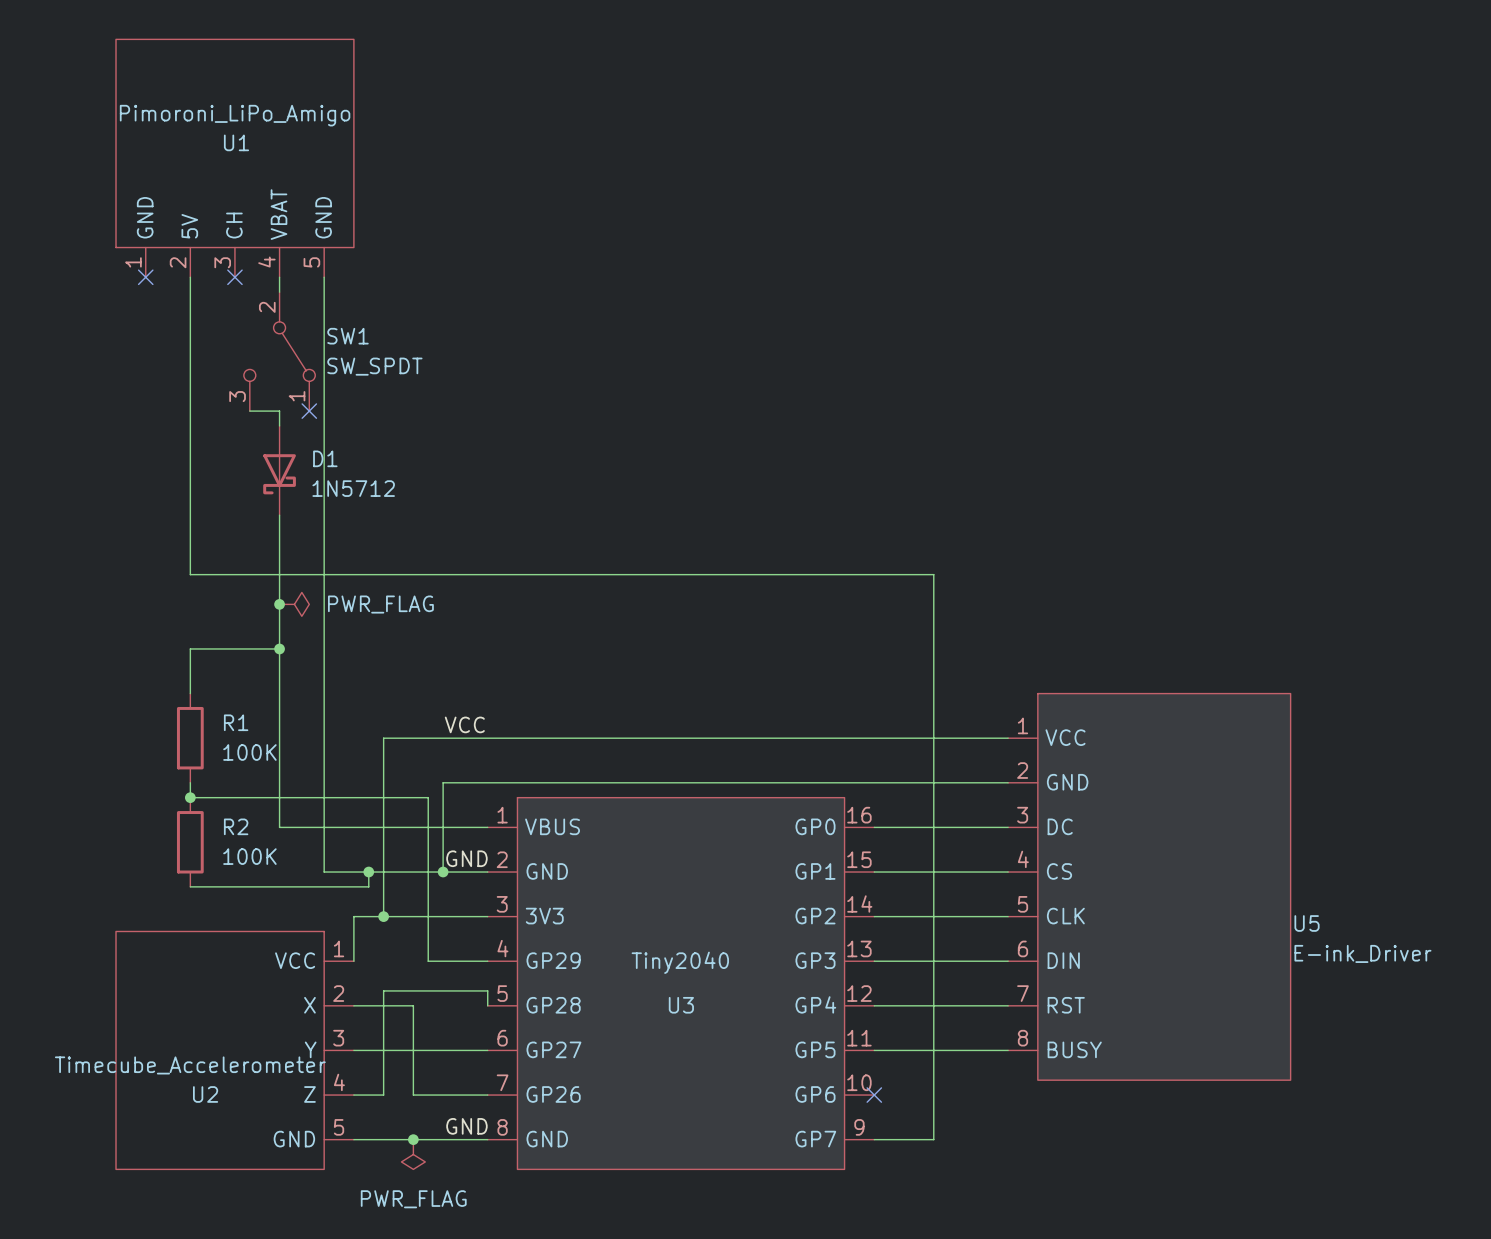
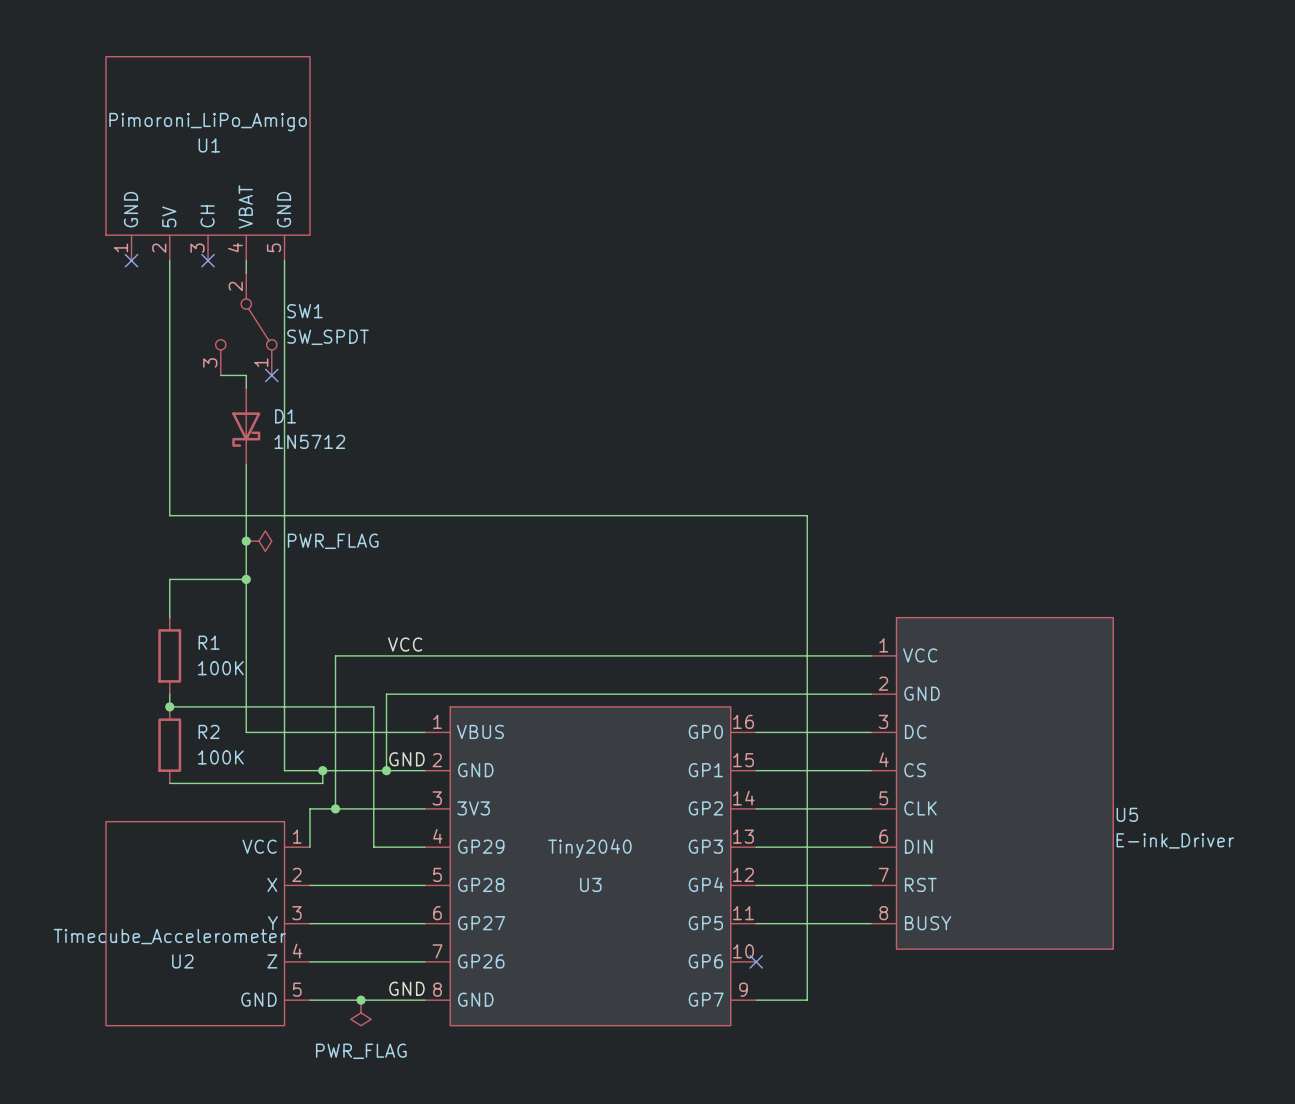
wire: (413, 1005) (413, 1095) -> (335, 961) (361, 961)
wire: (487, 1005) (487, 990) (383, 990) (383, 1095) -> (424, 885) (361, 885)

